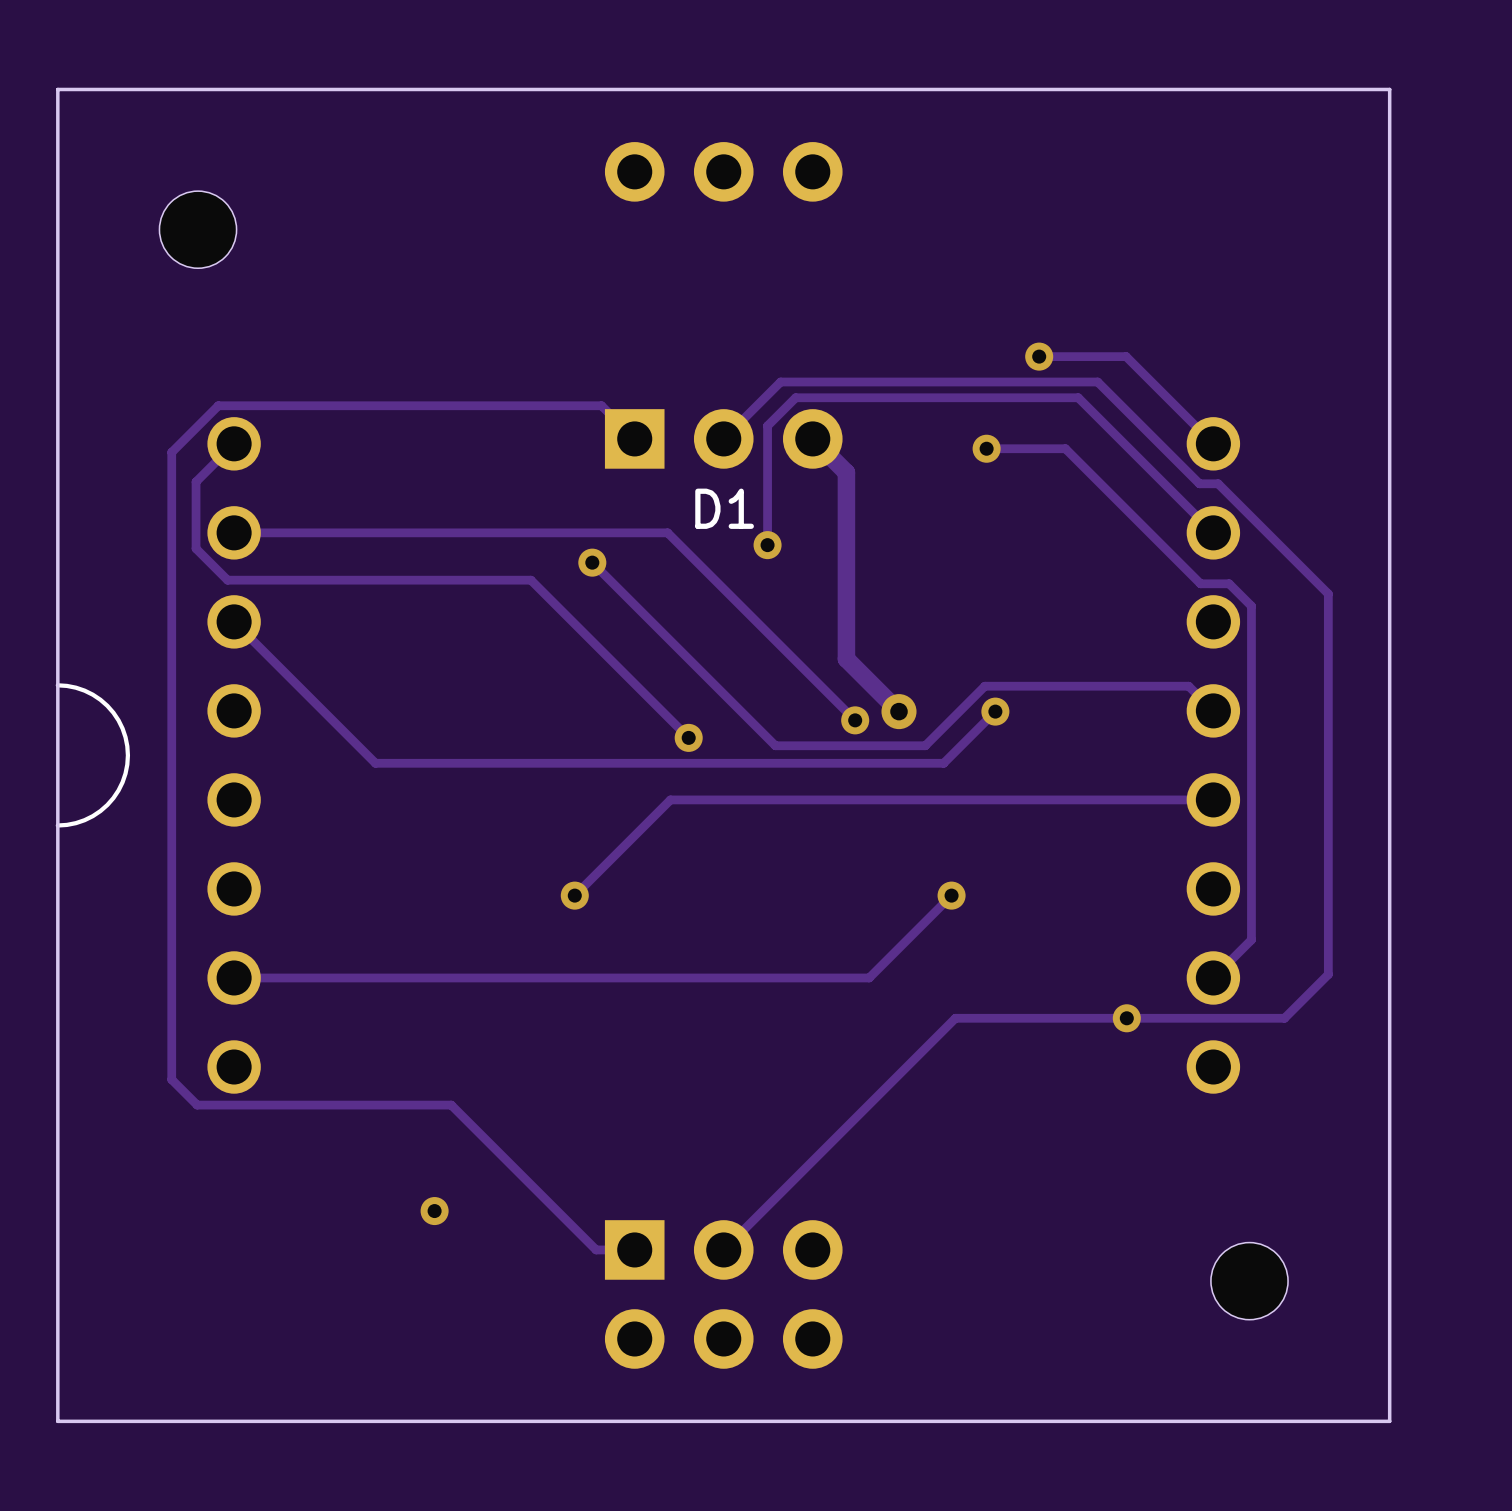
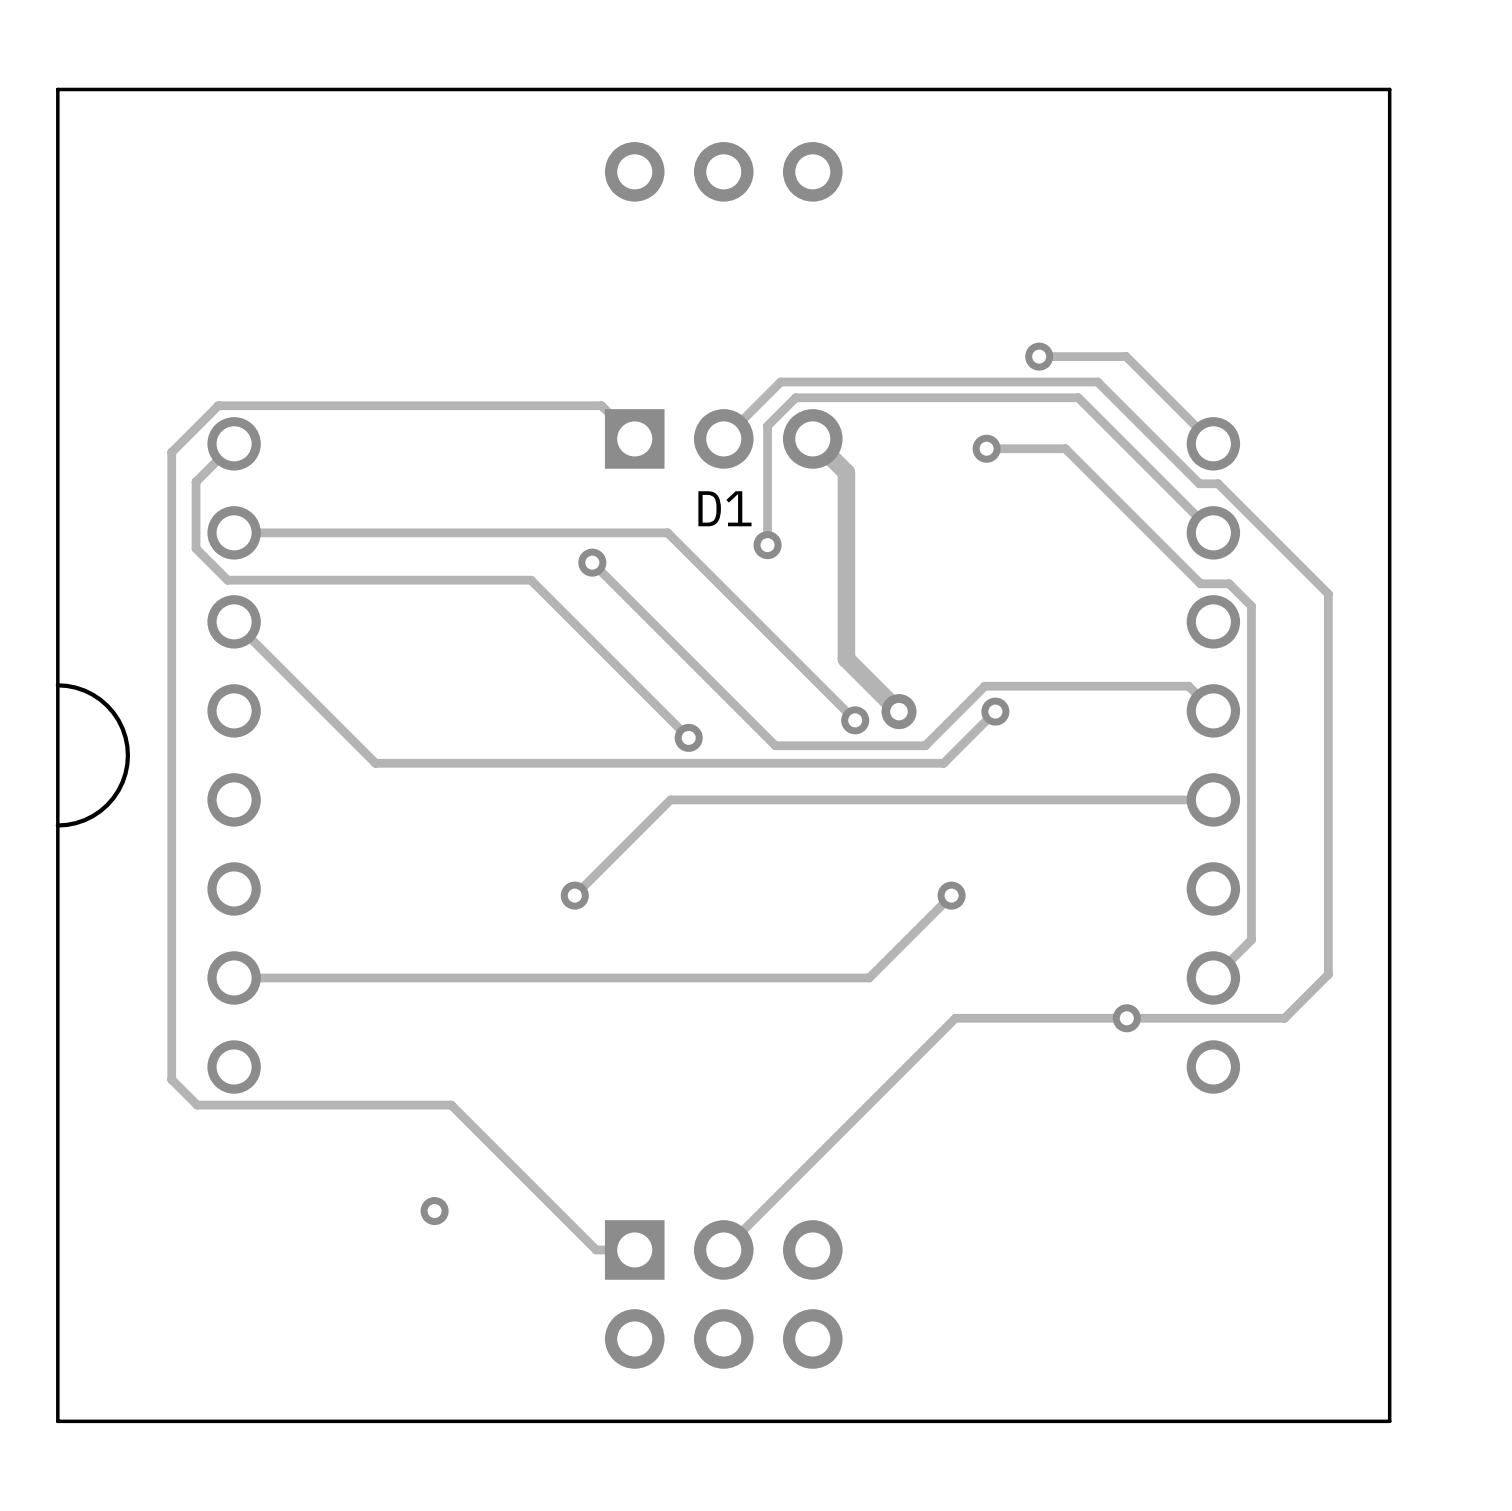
part: (198, 229) -> none
part: (1249, 1281) -> none

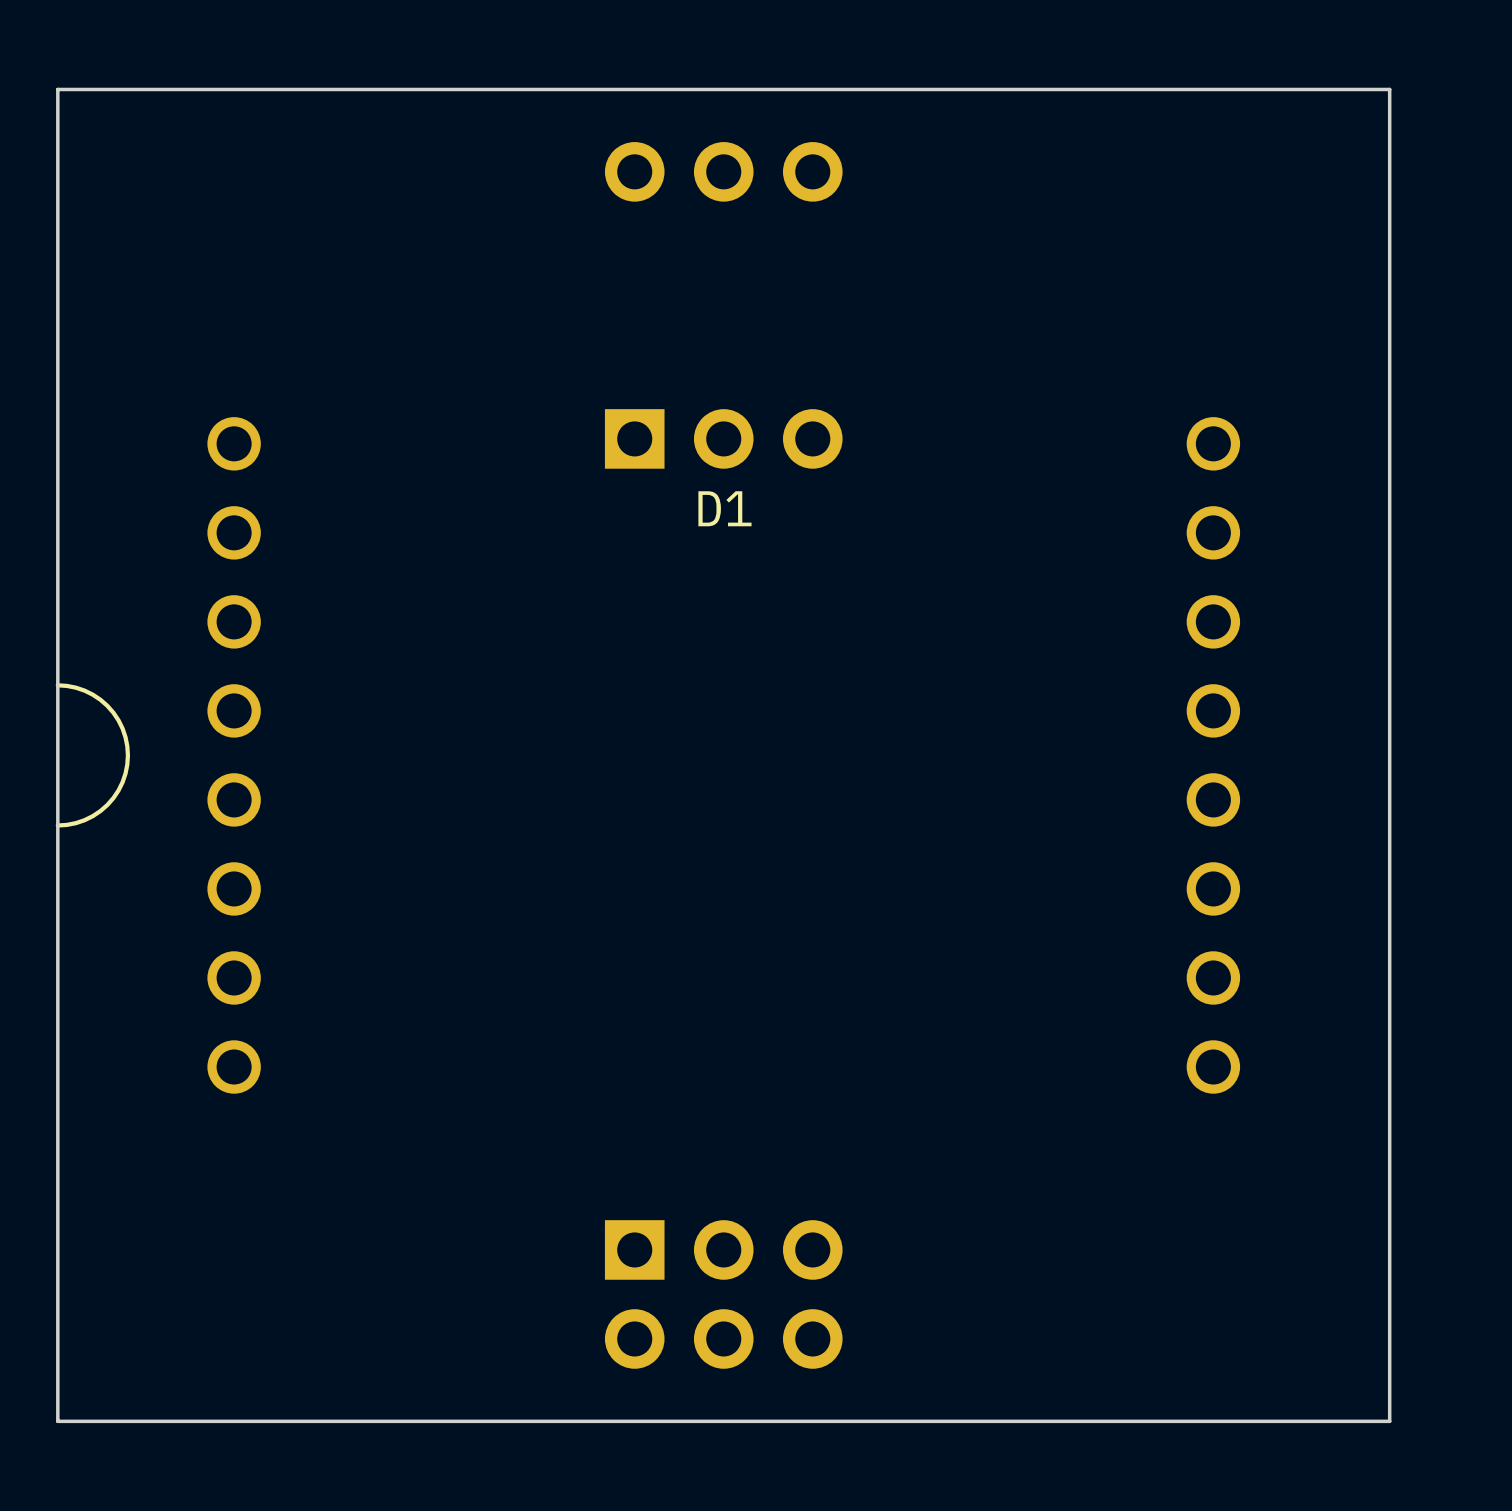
track: (1039, 356) (1126, 356) (1213, 443) -> none
via: (1039, 356) -> none
track: (634, 438) (601, 405) (218, 405) (171, 452) (171, 1079) (197, 1105) (451, 1105) (596, 1249) (634, 1249) -> none
track: (723, 438) (780, 382) (1097, 382) (1199, 483) (1218, 483) (1328, 593) (1328, 974) (1284, 1018) (955, 1018) (723, 1249) -> none
track: (812, 438) (846, 472) (846, 659) (899, 711) -> none
track: (234, 443) (196, 481) (196, 548) (227, 580) (530, 580) (688, 737) -> none
track: (986, 448) (1065, 448) (1200, 583) (1229, 583) (1251, 606) (1251, 939) (1213, 977) -> none
via: (986, 448) -> none
track: (234, 532) (667, 532) (855, 720) -> none
track: (1213, 532) (1078, 397) (795, 397) (767, 425) (767, 545) -> none
via: (767, 545) -> none
track: (592, 562) (775, 745) (925, 745) (984, 686) (1188, 686) (1213, 710) -> none
via: (592, 562) -> none
track: (234, 621) (375, 763) (943, 763) (995, 711) -> none
via: (899, 711) -> none
via: (995, 711) -> none
via: (855, 720) -> none
via: (688, 737) -> none
track: (1213, 799) (670, 799) (574, 895) -> none
via: (574, 895) -> none
track: (951, 895) (869, 977) (234, 977) -> none
via: (951, 895) -> none
via: (1126, 1018) -> none
via: (434, 1211) -> none

